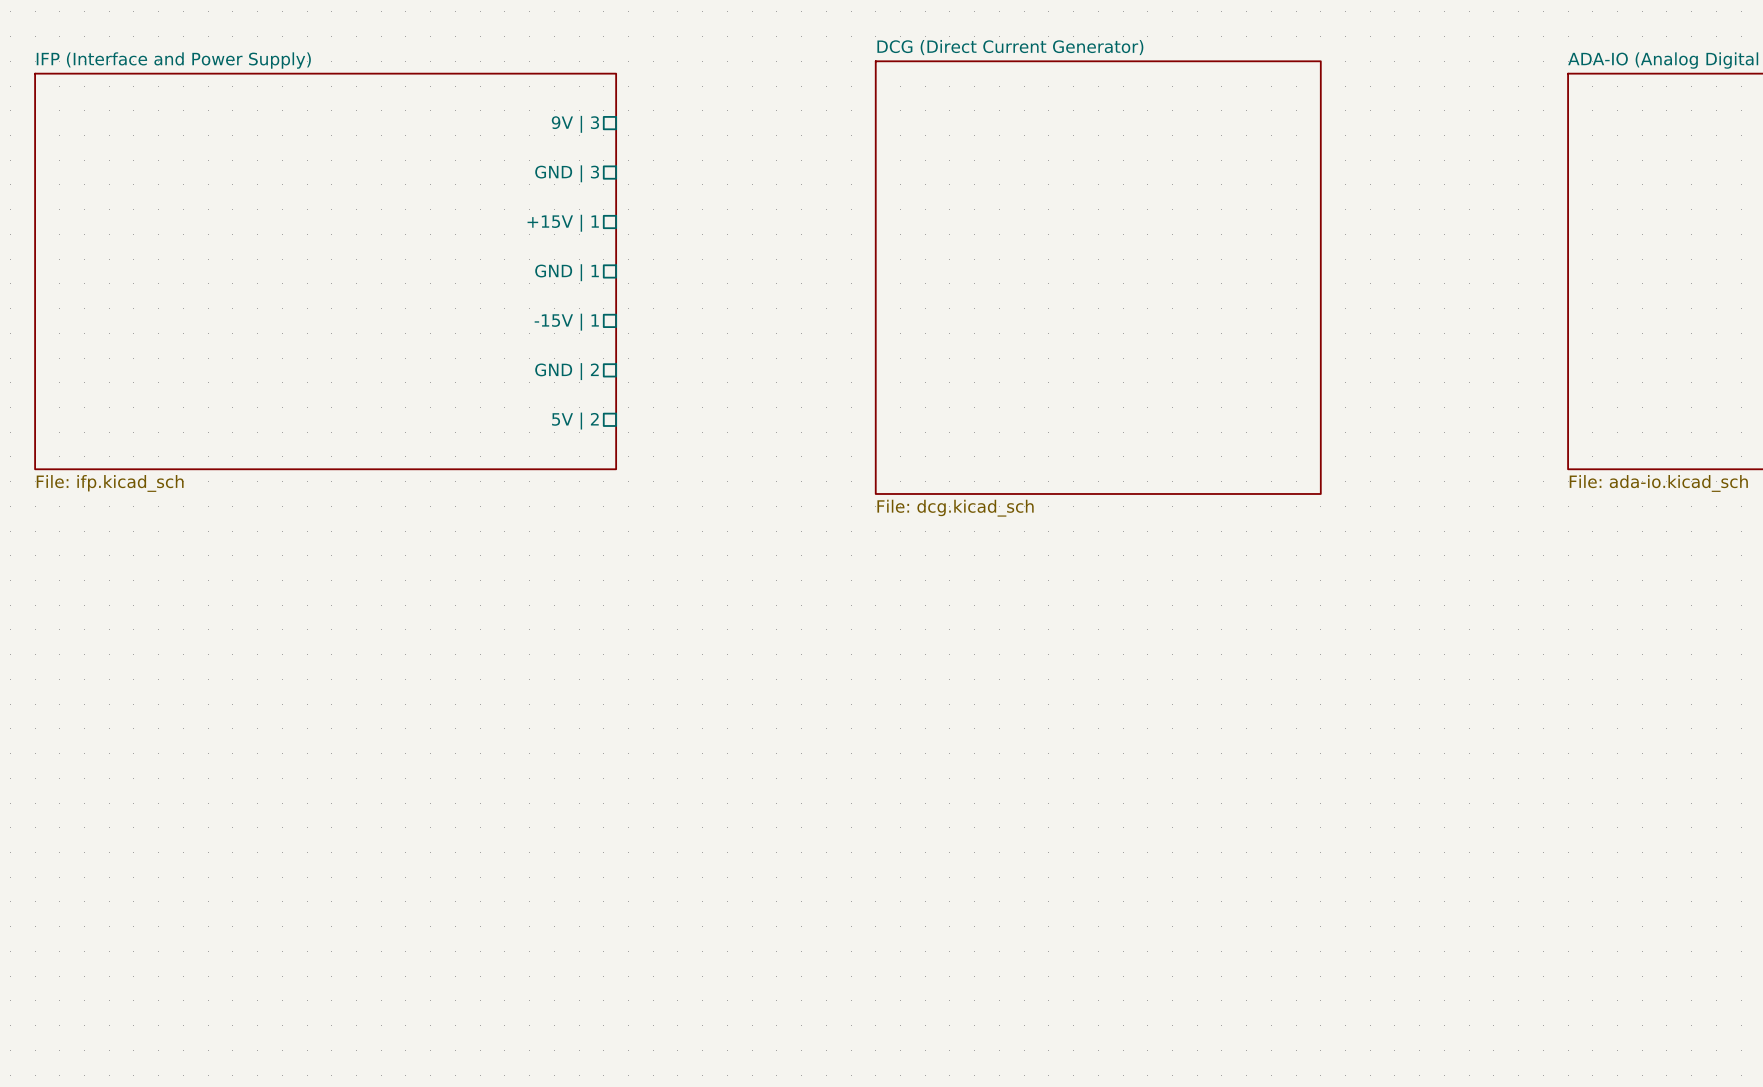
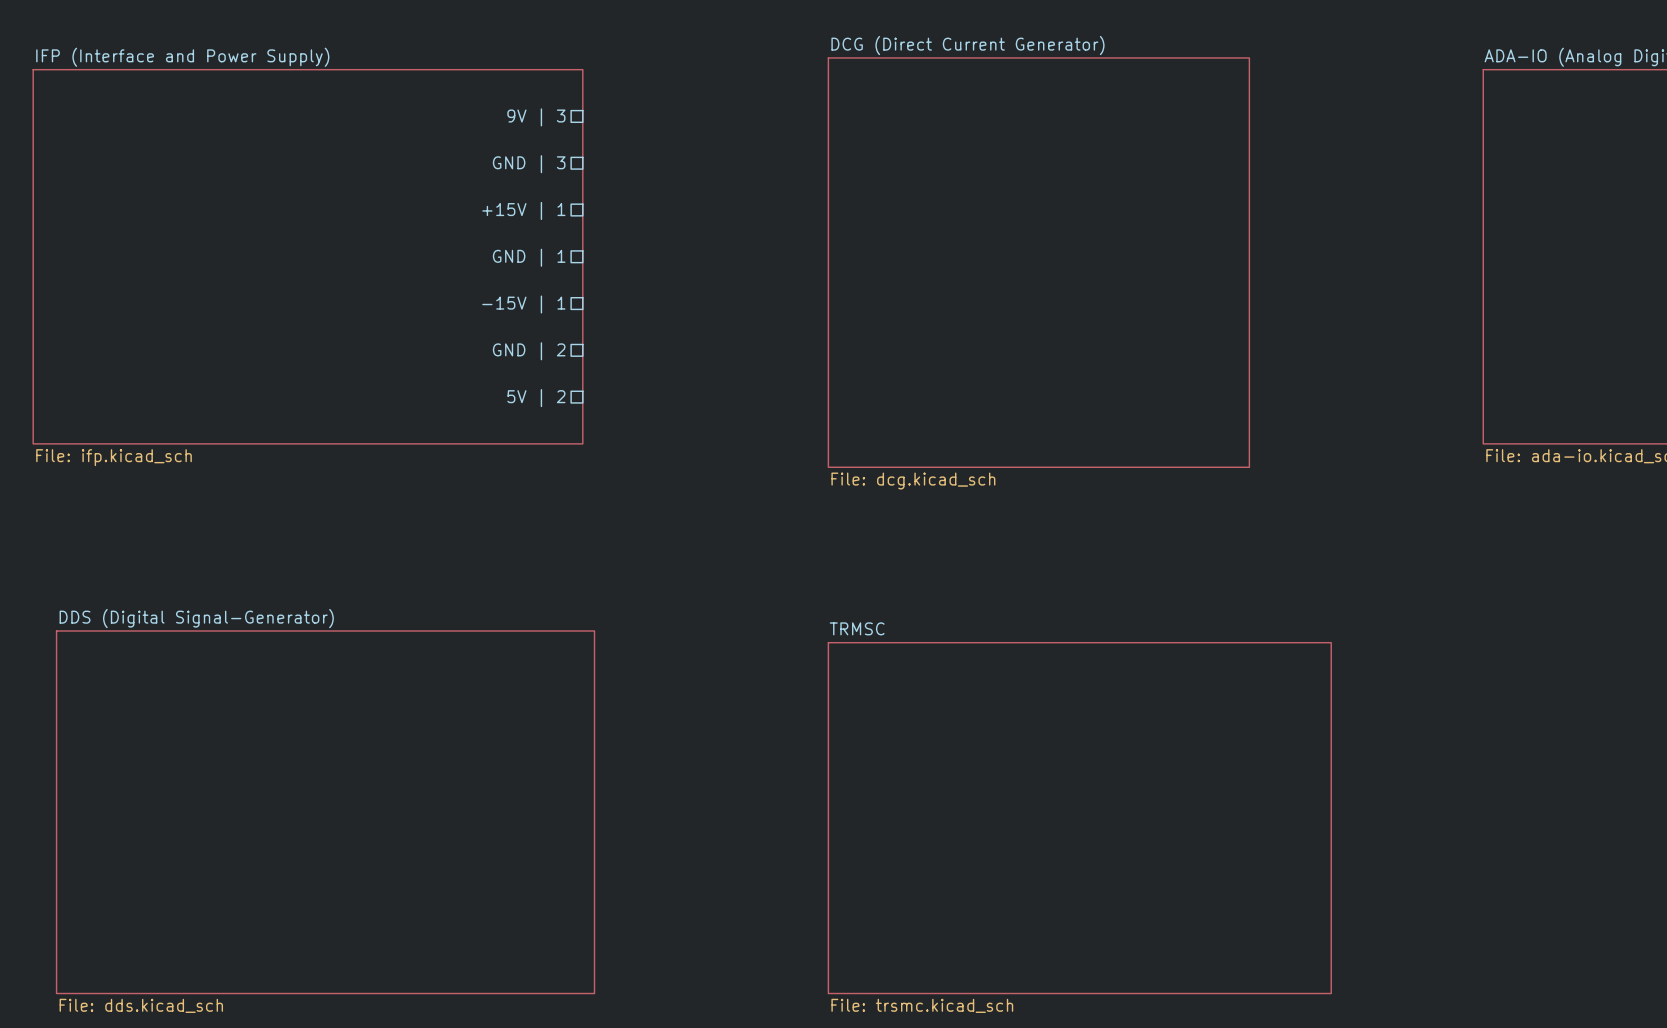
sheet DDS (Digital Signal-Generator): none -> File: dds.kicad_sch (325, 812)
sheet TRMSC: none -> File: trsmc.kicad_sch (1079, 818)

